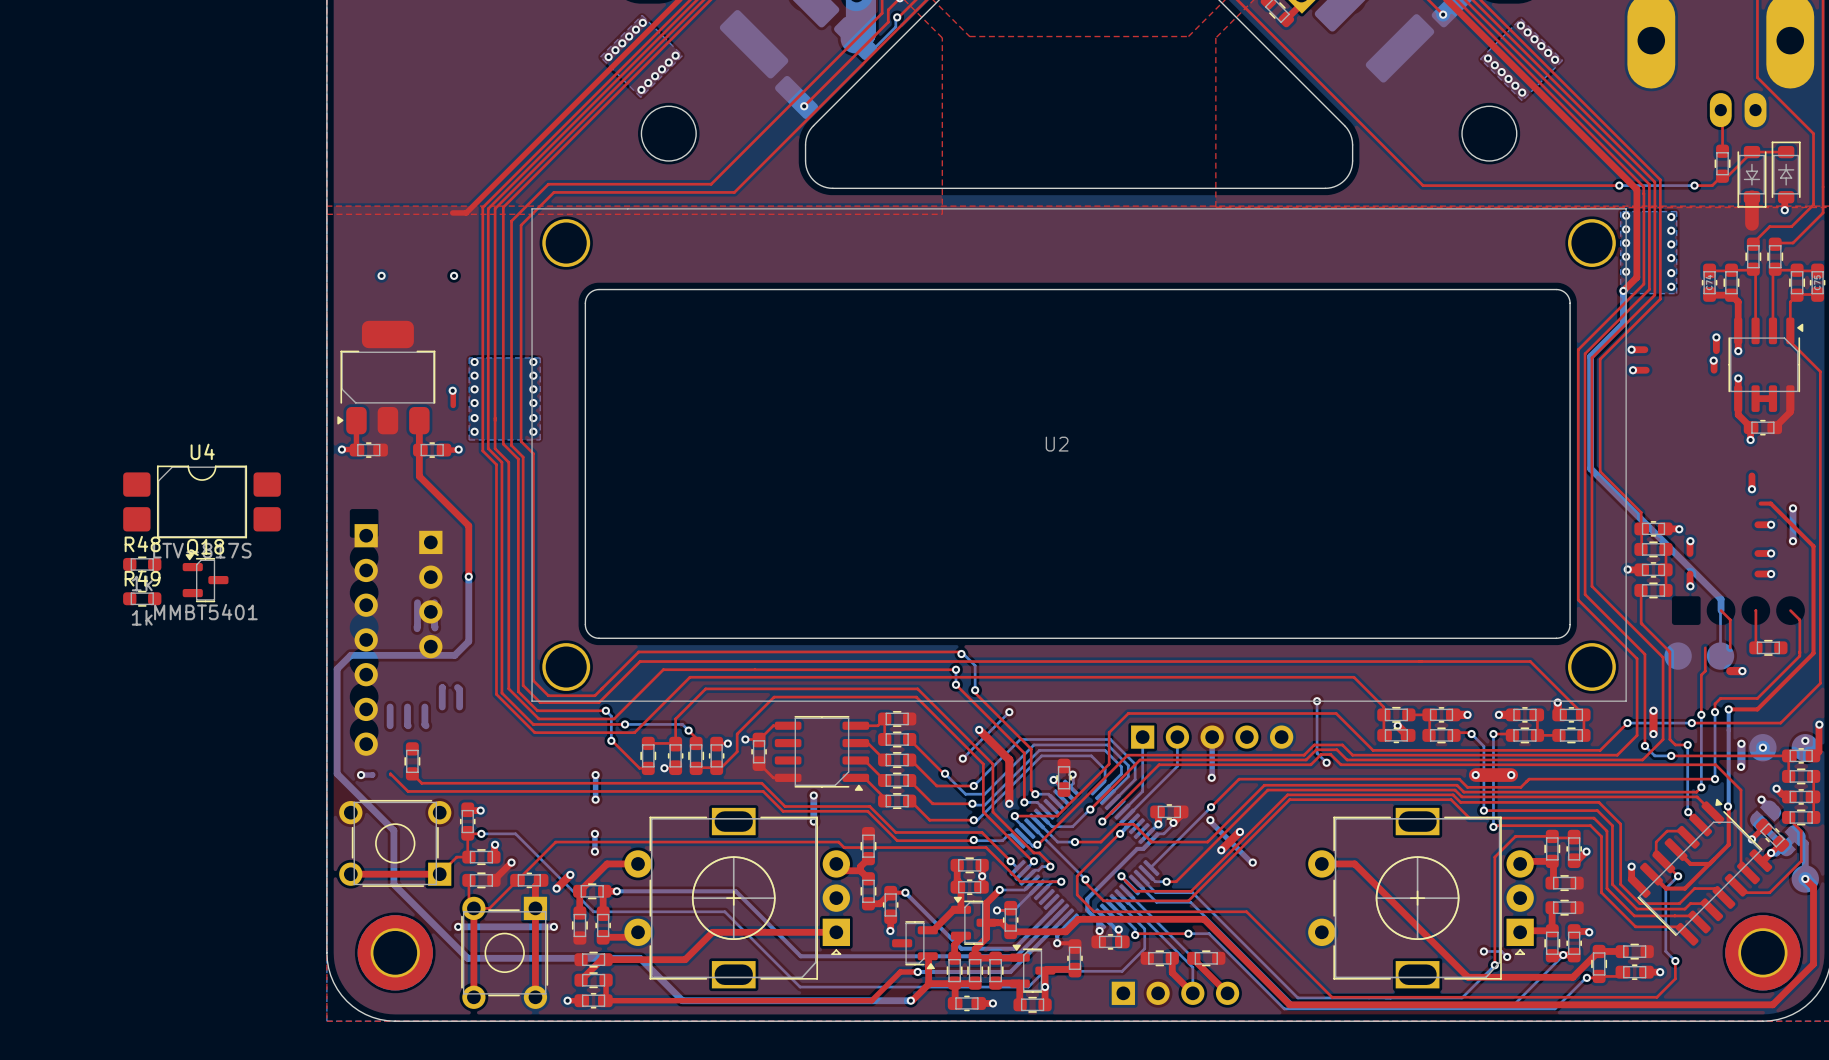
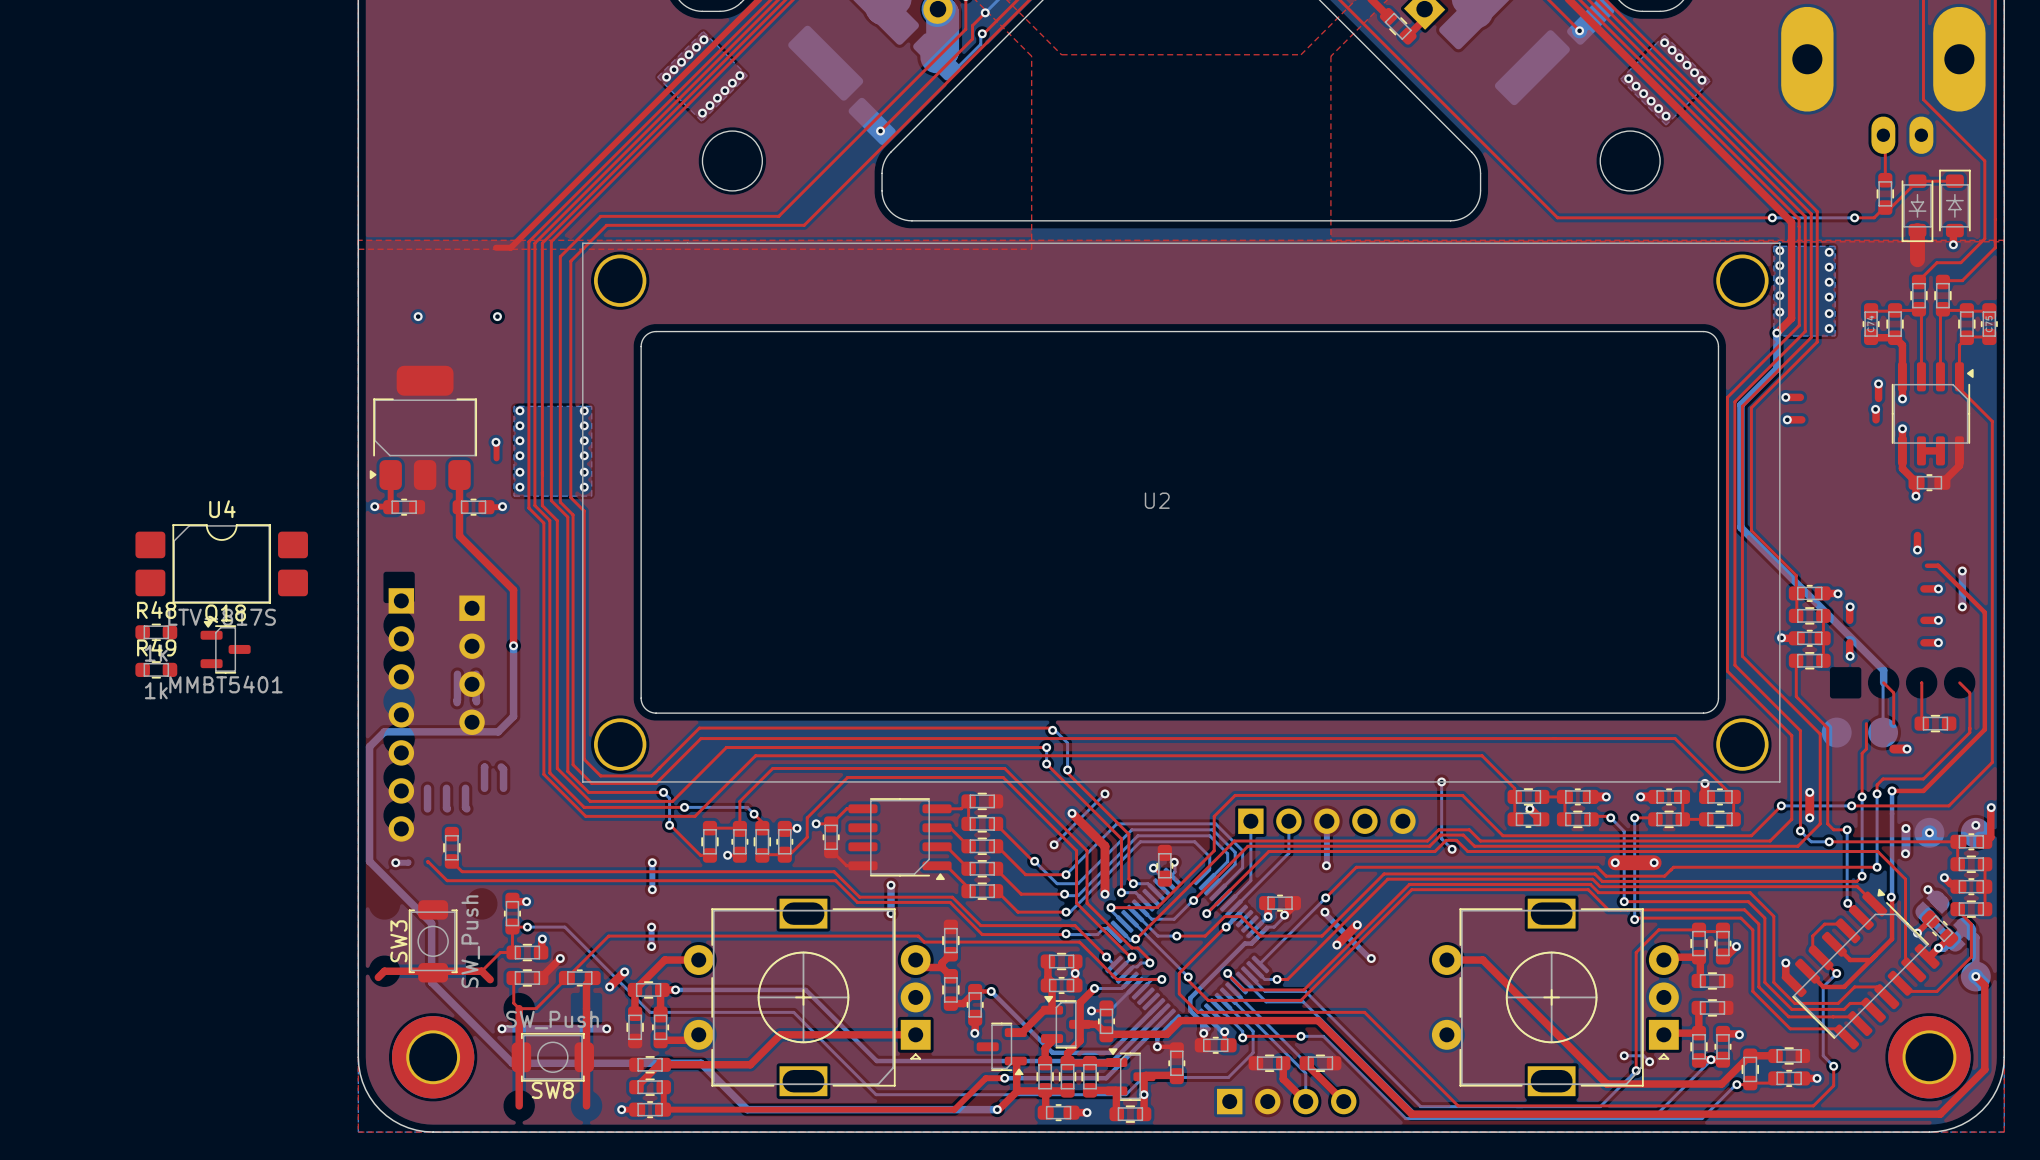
part: (395, 843) -> none
SW3: none -> SW_Push (433, 941)
part: (504, 952) -> none
SW8: none -> SW_Push (552, 1057)

